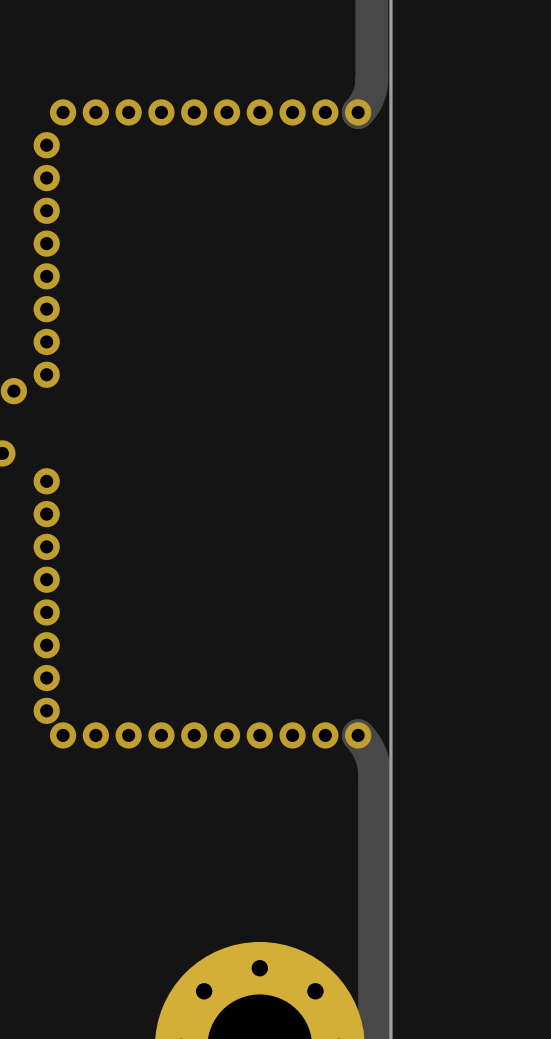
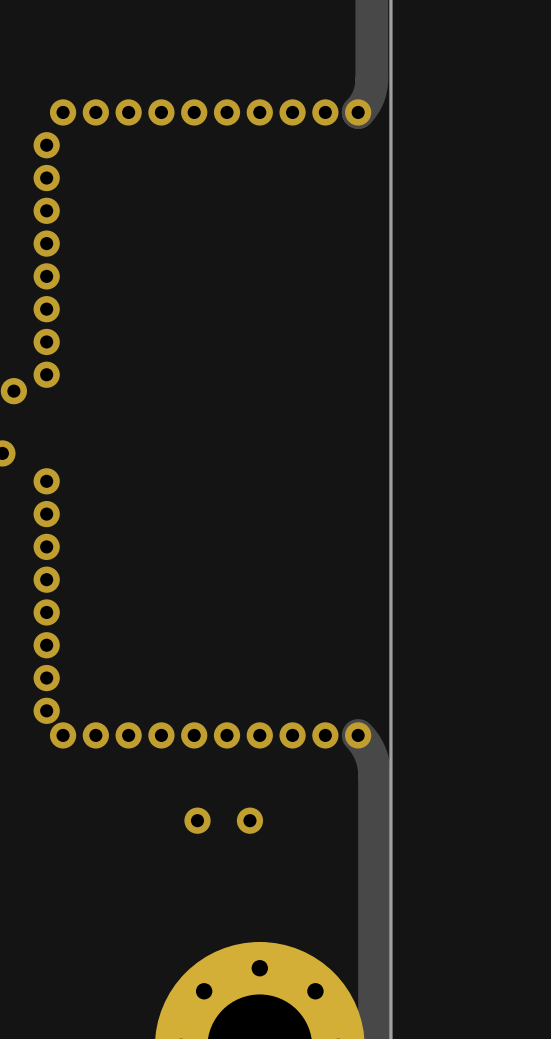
via: none -> (197, 820)
via: none -> (249, 820)

